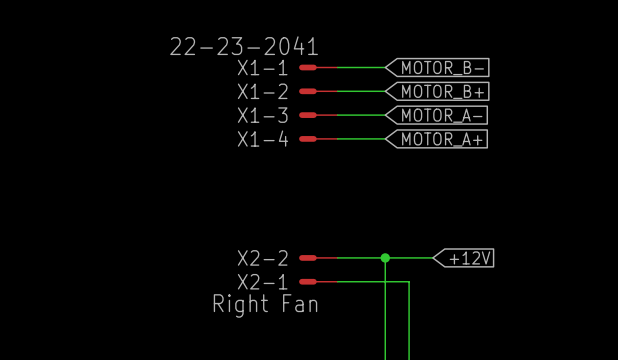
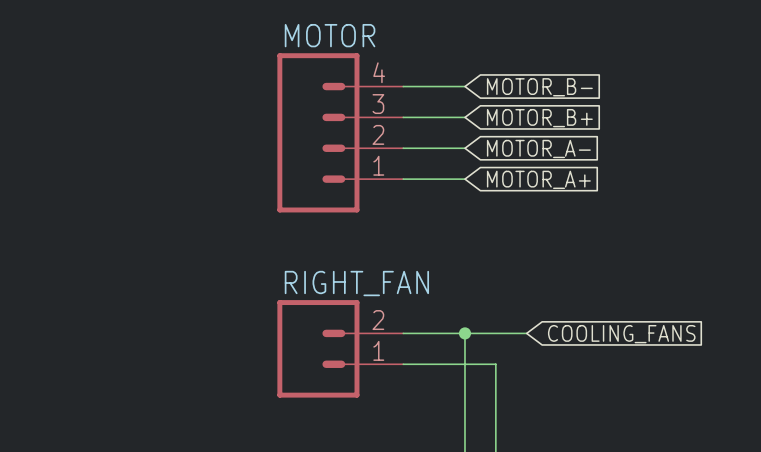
X1-1: 22-23-2041 (318, 67) -> none
X1-2: (318, 91) -> none
MOTOR: none -> (340, 132)
X1-3: (318, 115) -> none
X1-4: (318, 138) -> none
X2-2: (318, 257) -> none
global label: +12V (469, 257) -> COOLING_FANS (621, 334)
RIGHT_FAN: none -> (340, 348)
X2-1: Right Fan (318, 281) -> none

